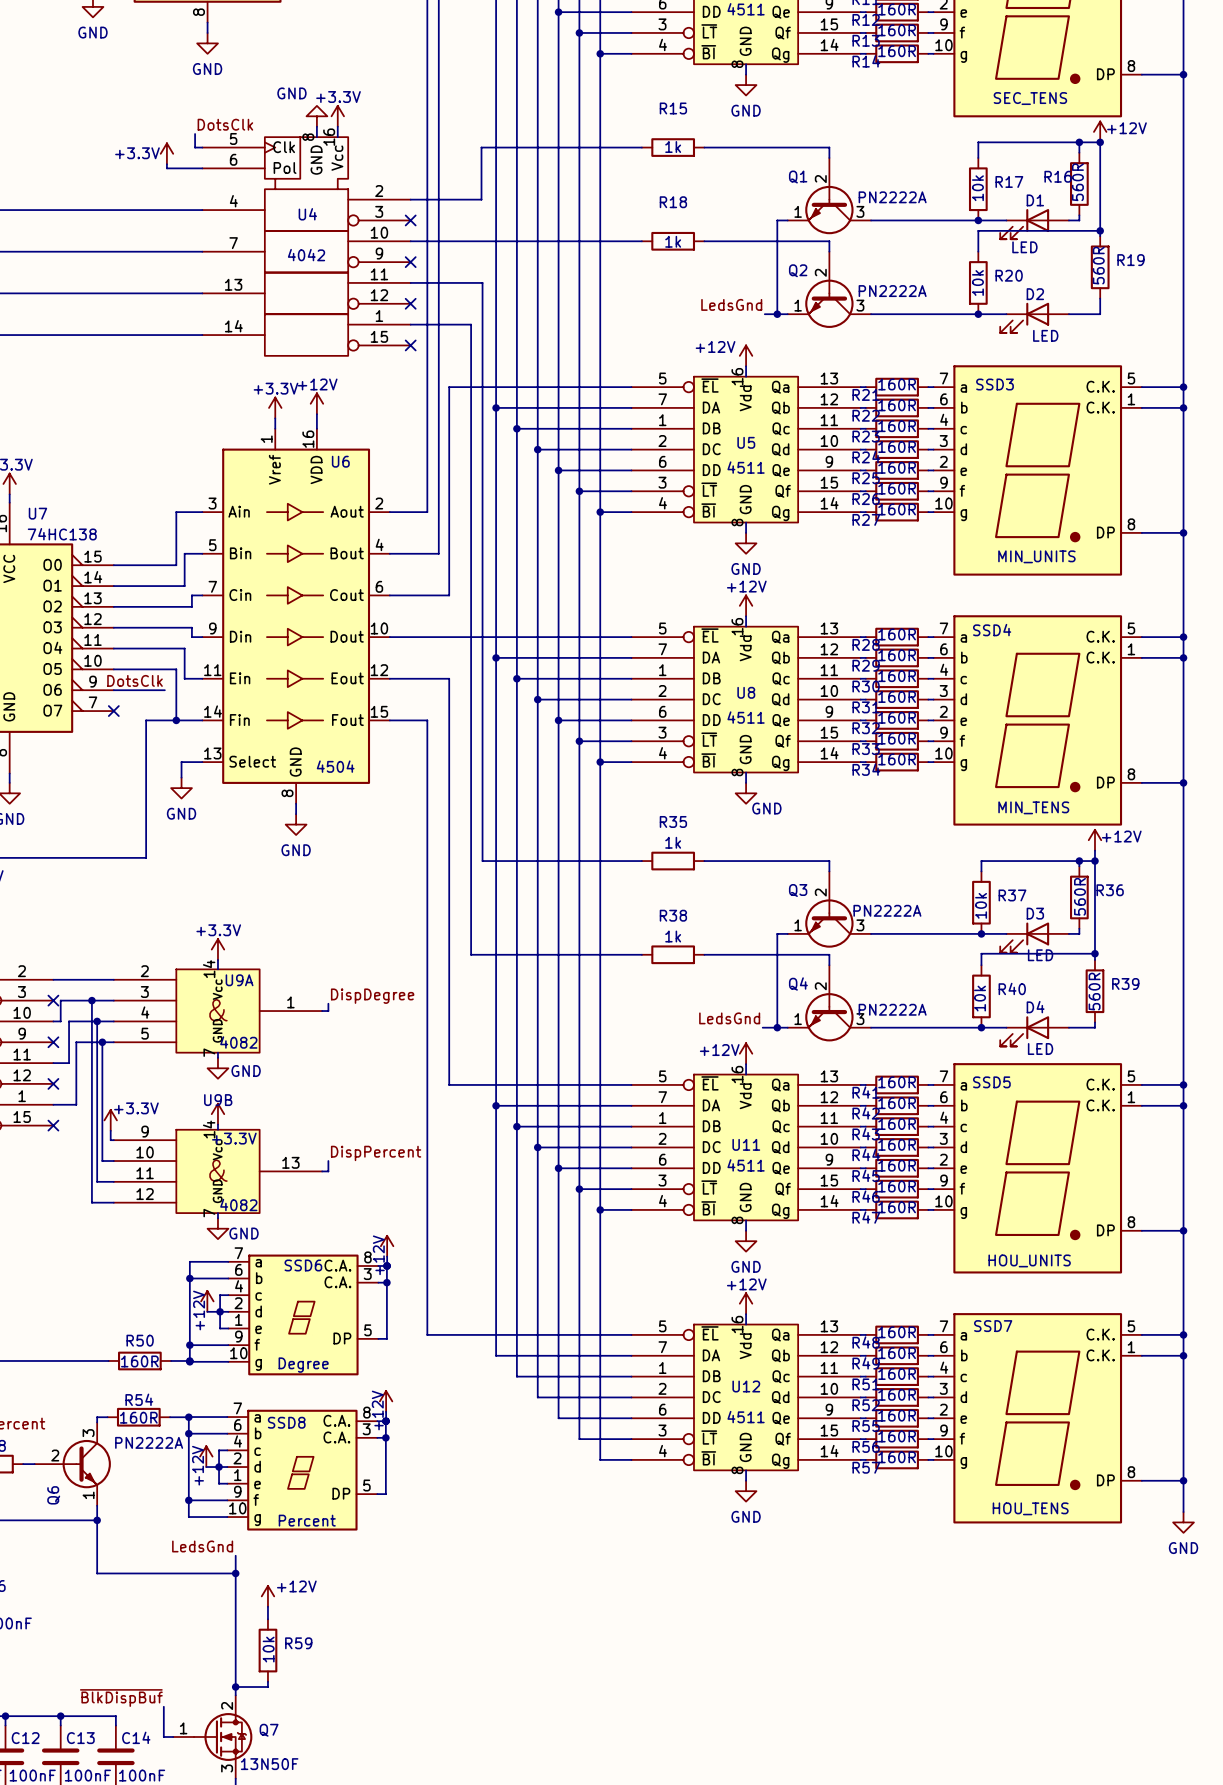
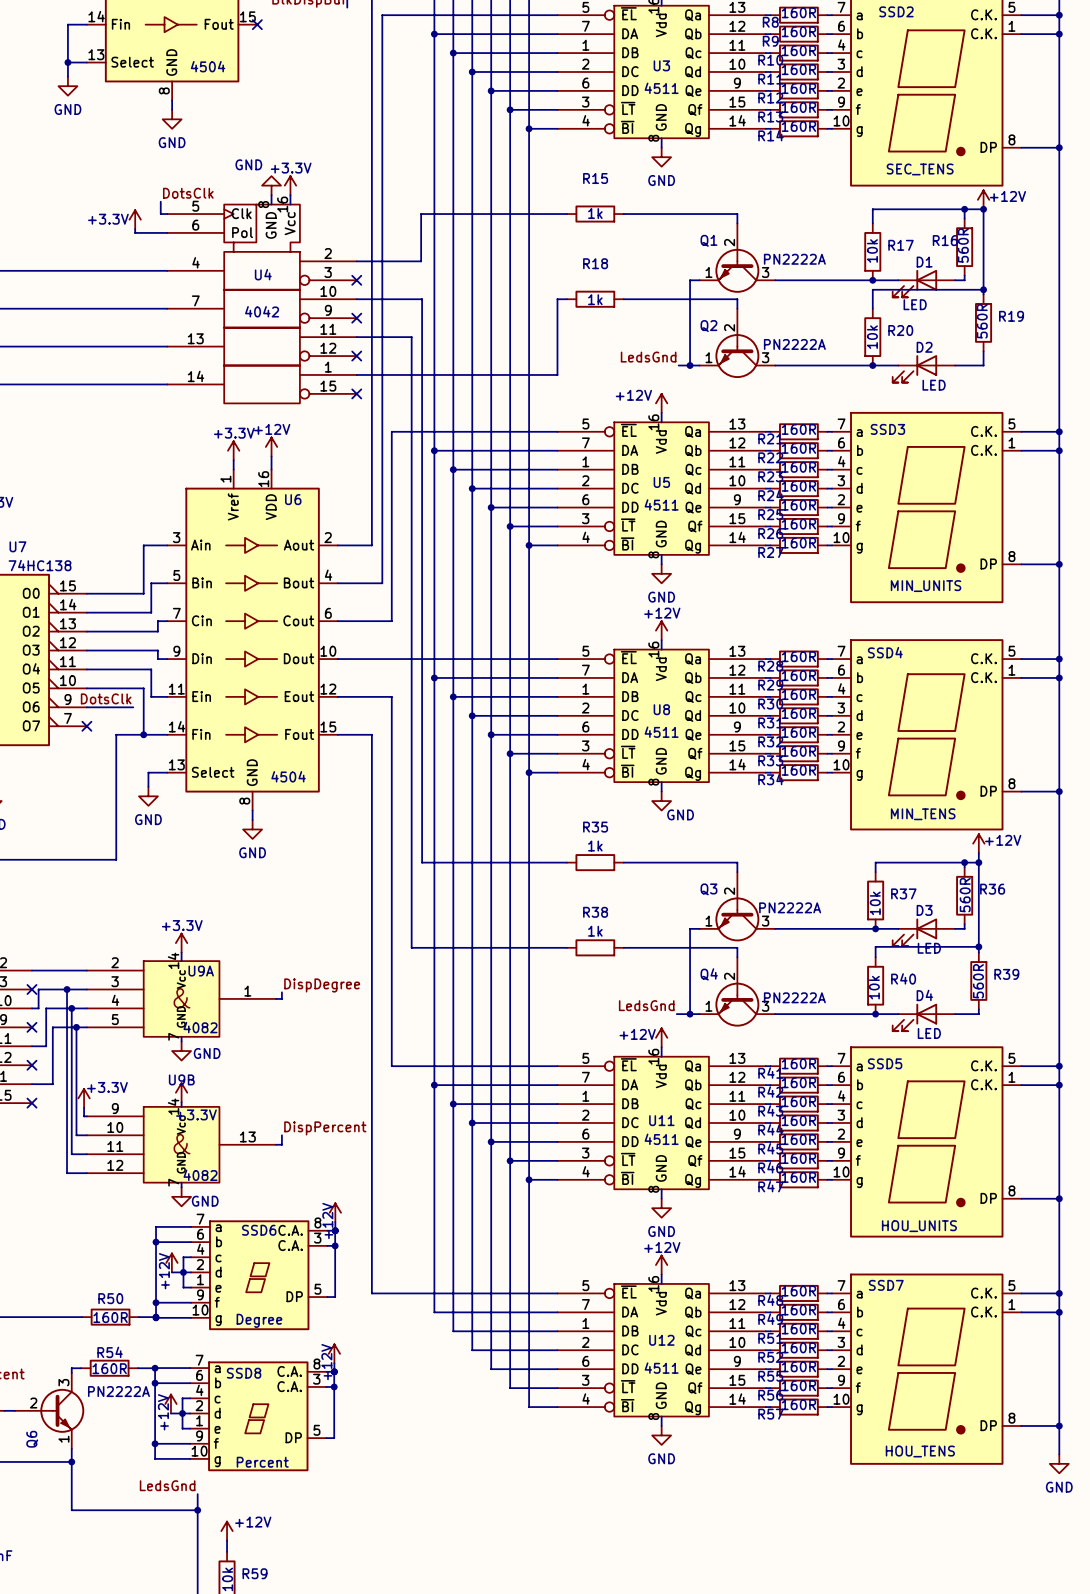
wire: (482, 241) (631, 241) -> (411, 337) (411, 374) (557, 374) (557, 299)
wire: (471, 282) (482, 282) -> (422, 299) (422, 337)

